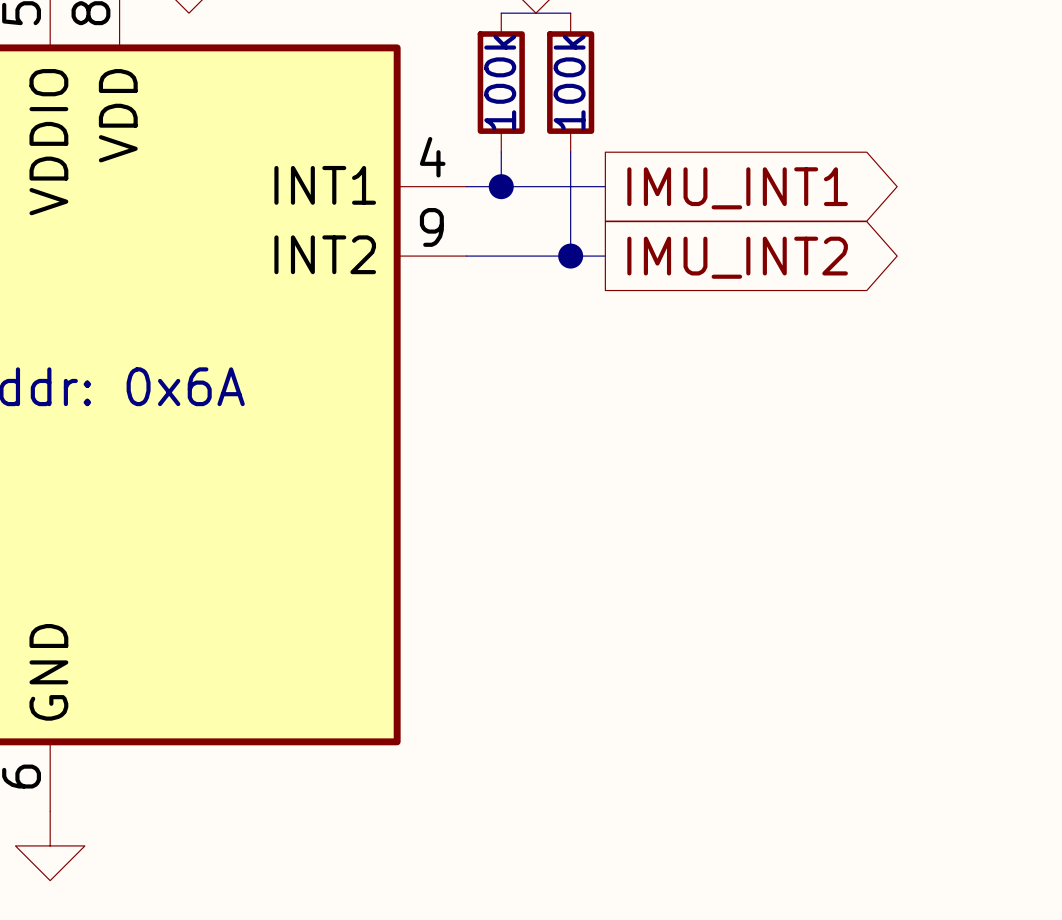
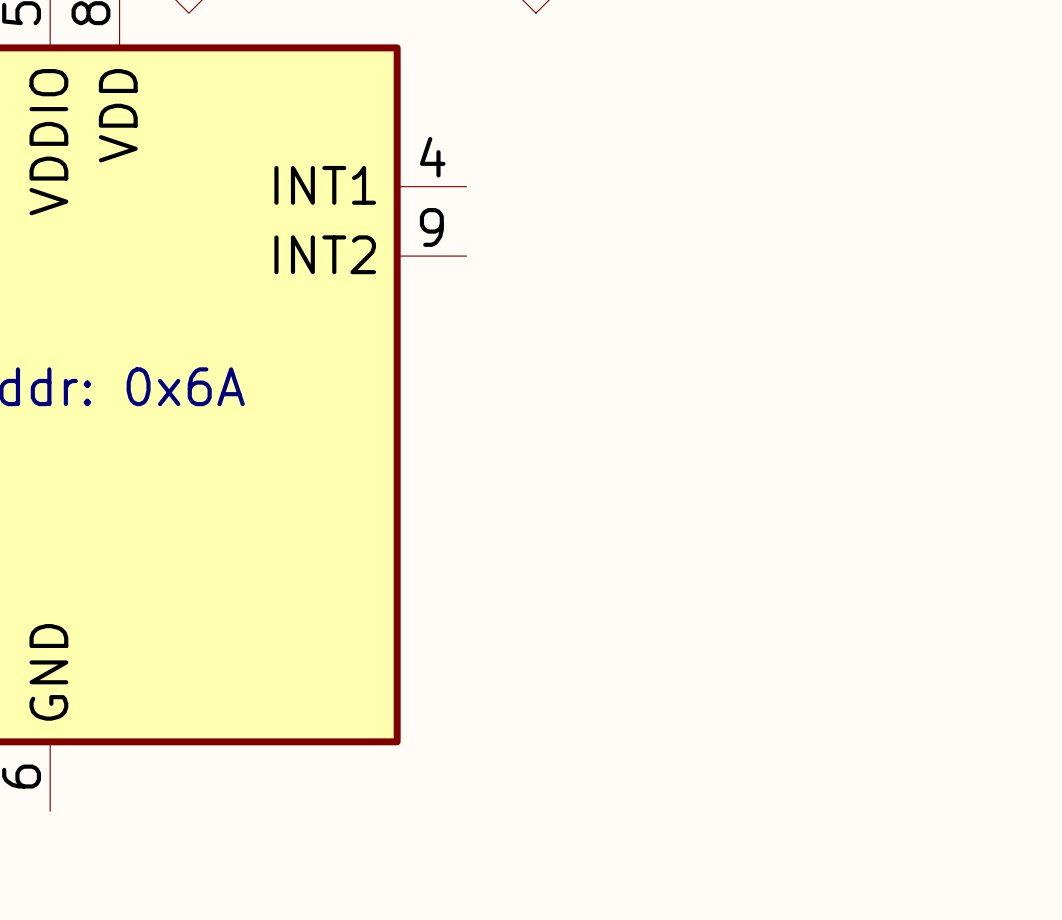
wire: (501, 13) (570, 13) -> none
part: 100k (501, 82) -> none
part: 100k (570, 82) -> none
wire: (501, 151) (501, 186) -> none
wire: (570, 151) (570, 256) -> none
wire: (466, 186) (605, 186) -> none
junction: (501, 186) -> none
global label: IMU_INT1 (737, 188) -> none
wire: (466, 256) (605, 256) -> none
junction: (570, 256) -> none
global label: IMU_INT2 (737, 257) -> none
power symbol: (50, 845) -> none

